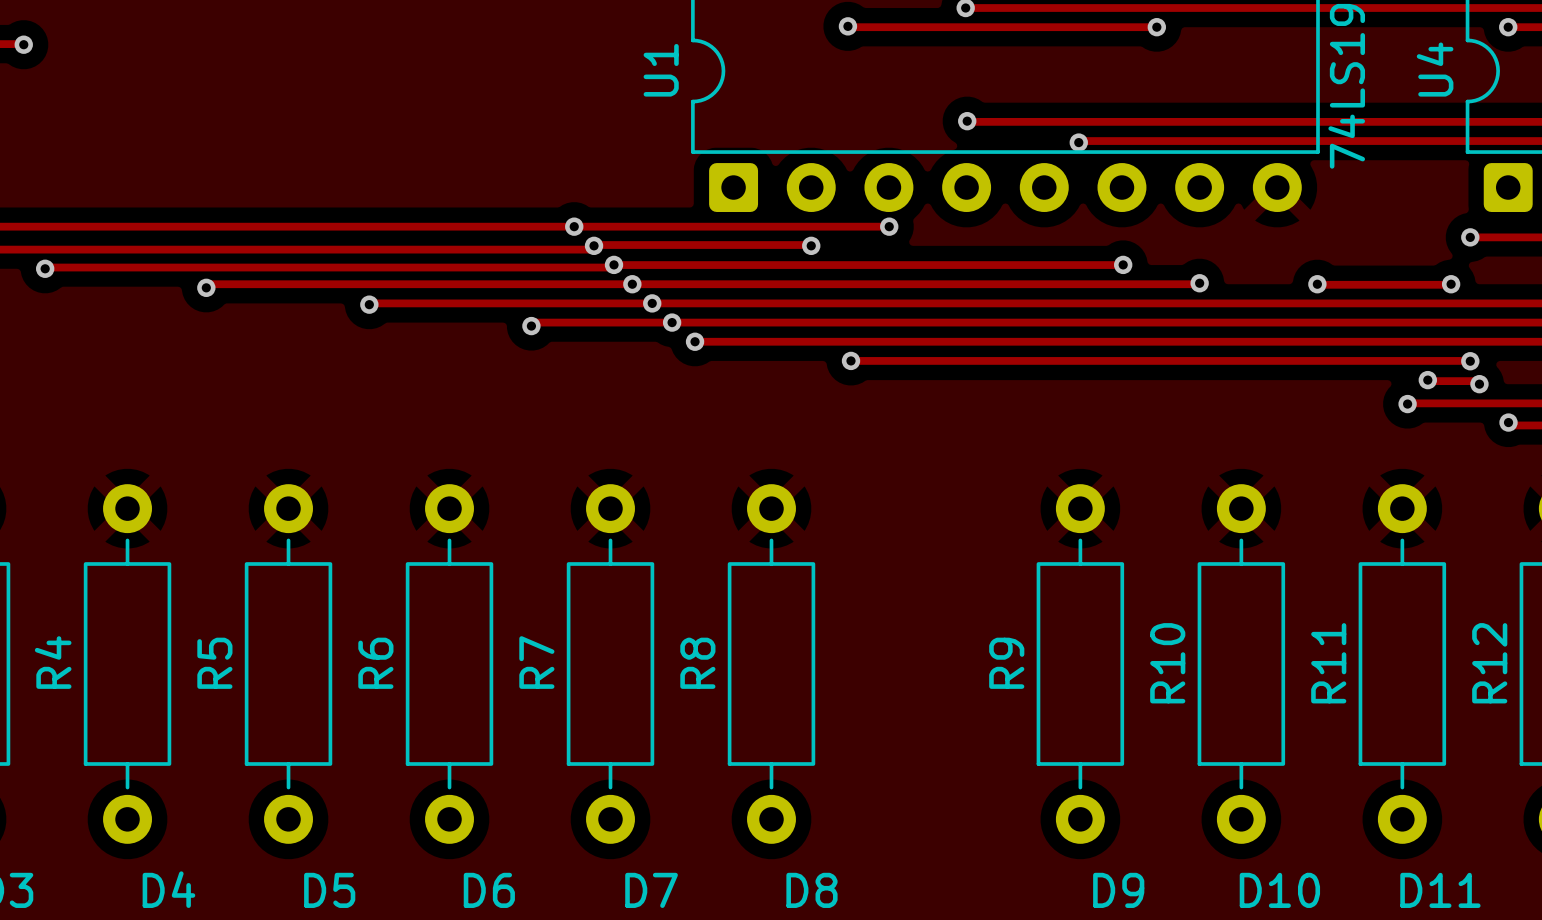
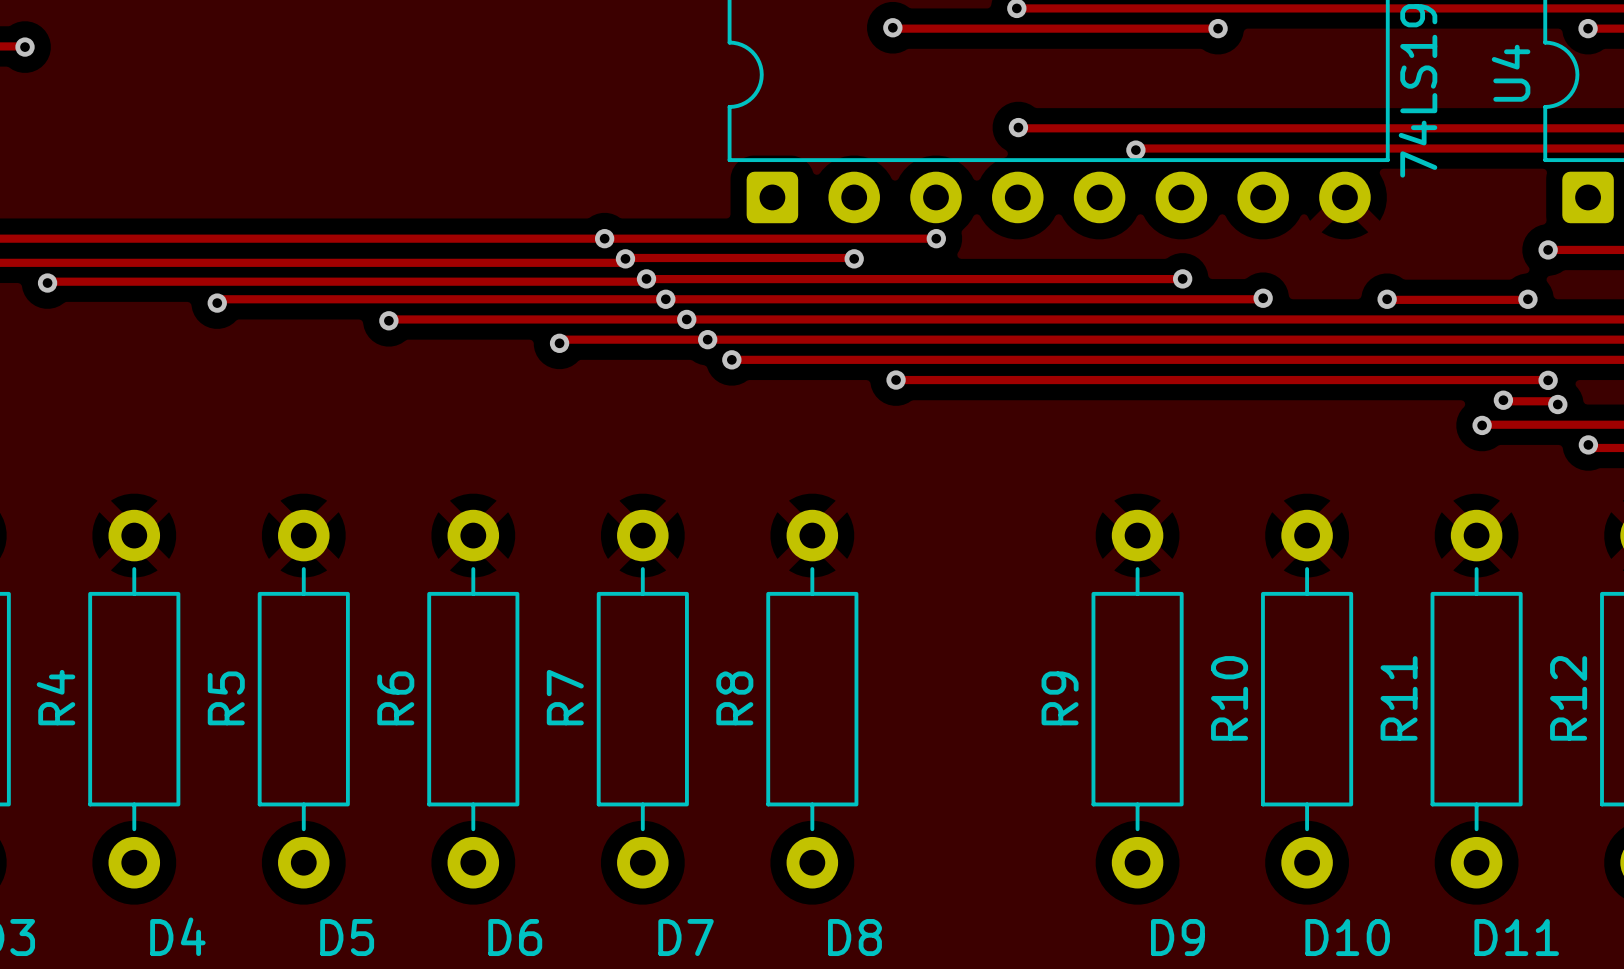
U1 name: U1 (661, 70) -> none

